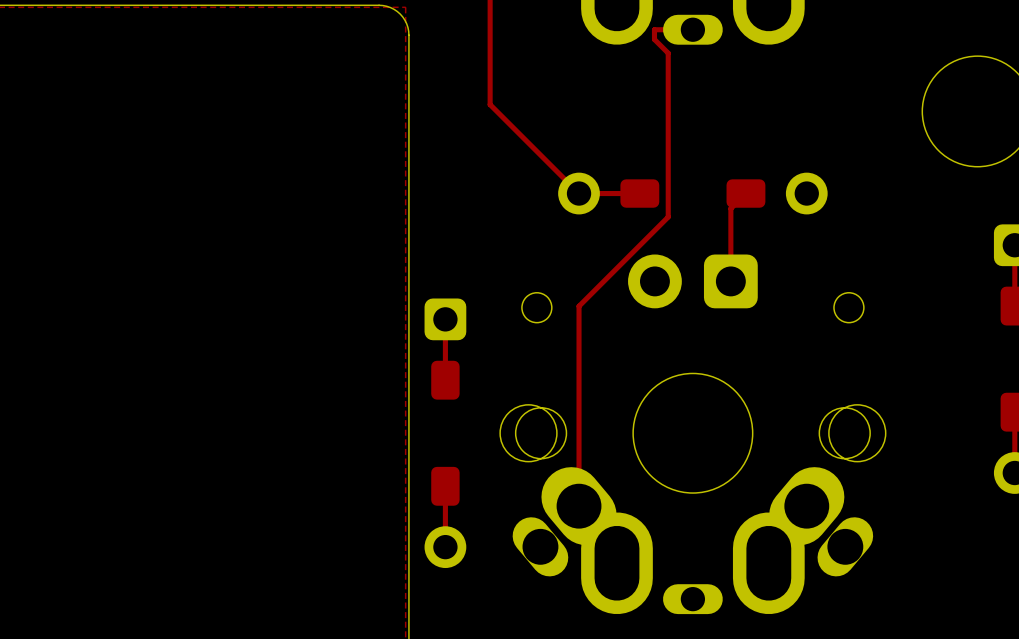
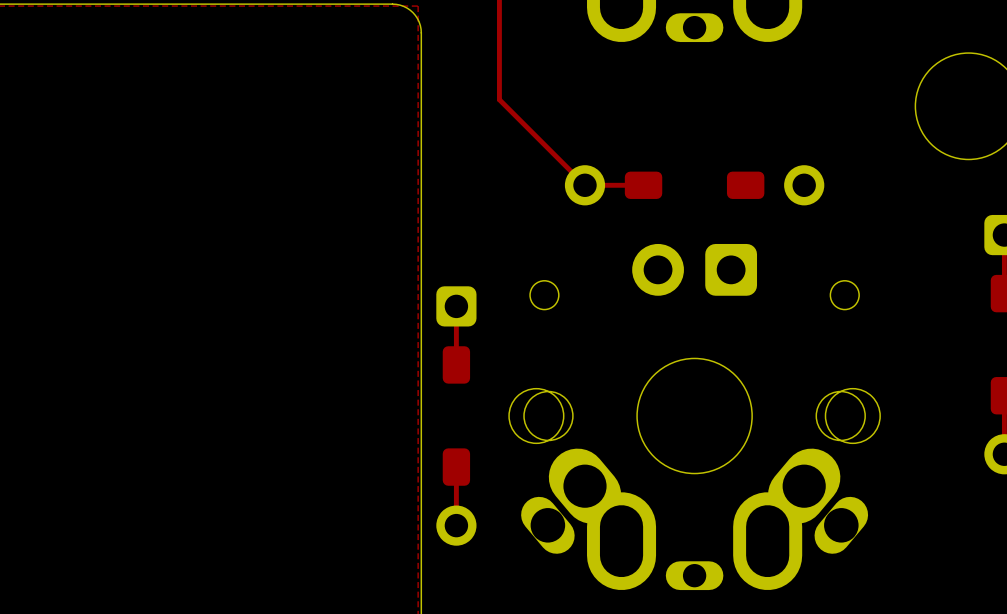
track: (692, 29) (654, 29) (654, 39) (668, 53) (668, 217) (579, 306) (579, 506) -> none
track: (745, 193) (730, 208) (730, 281) -> none

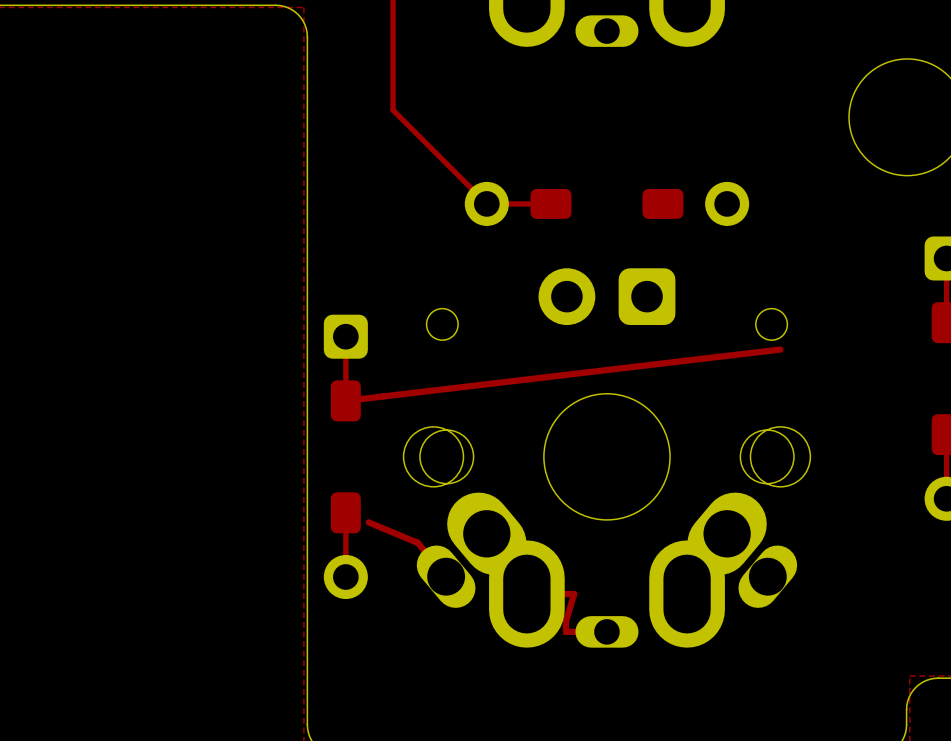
track: none -> (780, 349) (345, 400)
track: none -> (368, 522) (417, 542) (446, 576)
track: none -> (526, 594) (574, 594) (565, 621) (565, 631) (606, 631)

